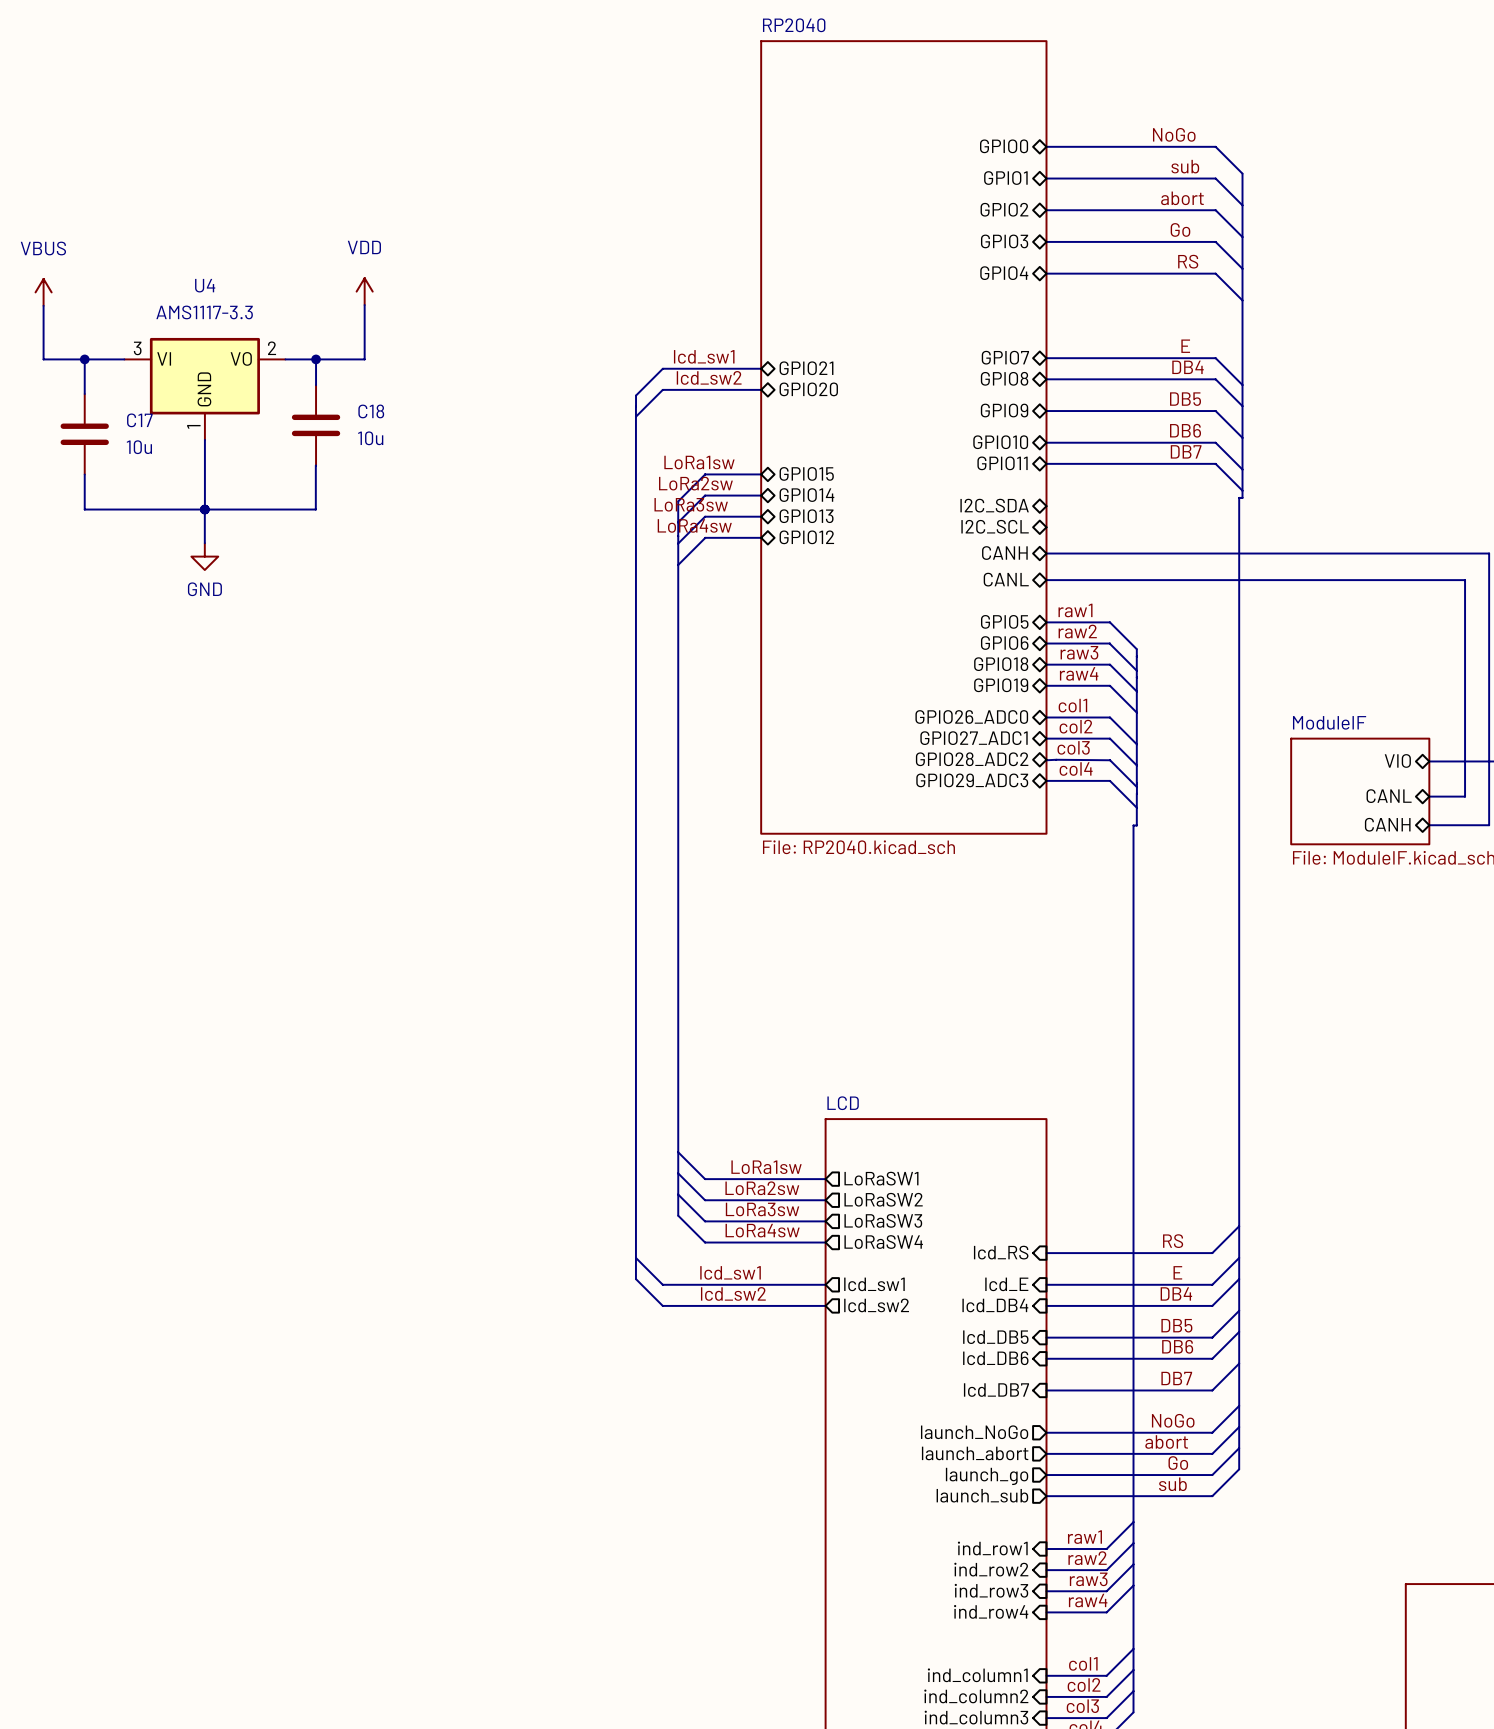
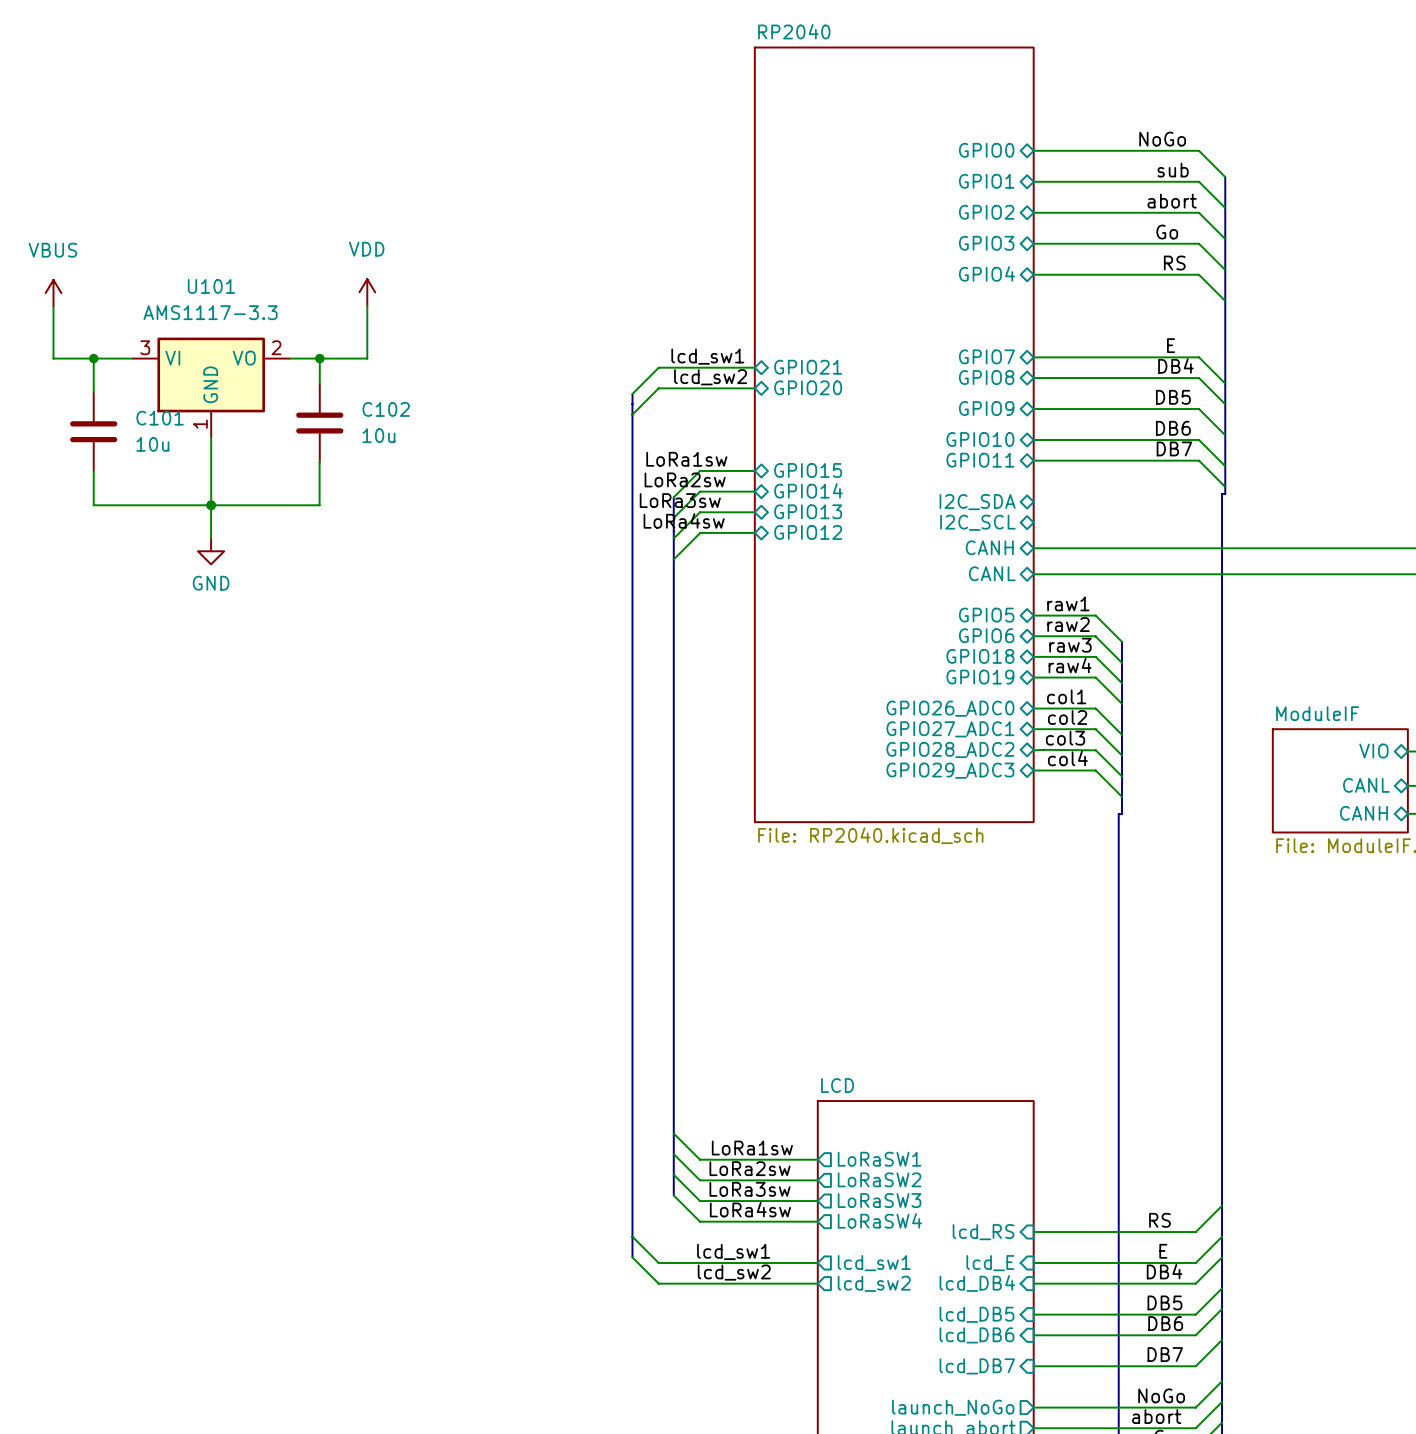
U4 name: U4 (205, 285) -> U101 (211, 286)
C18 name: C18 (371, 411) -> C102 (386, 409)
C17 name: C17 (139, 420) -> C101 (160, 418)

